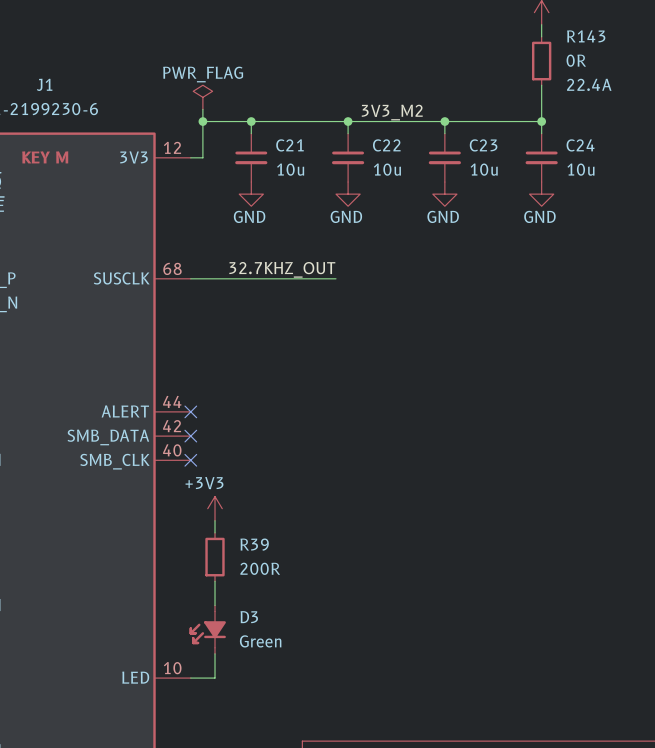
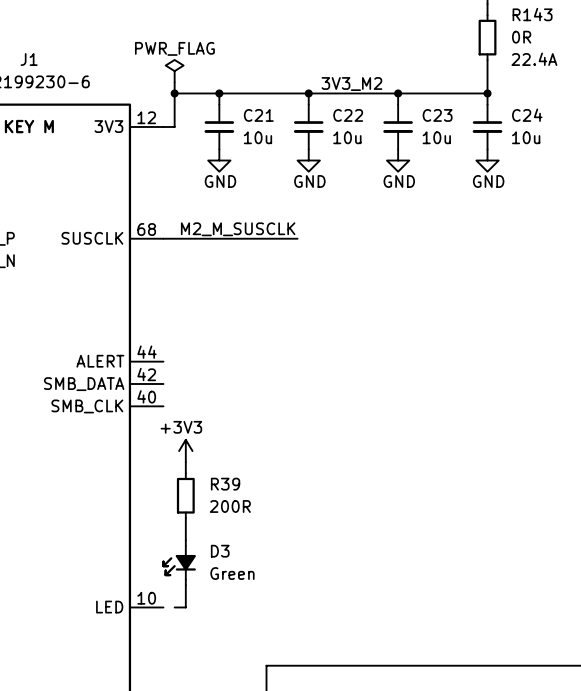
label: 32.7KHZ_OUT (282, 269) -> M2_M_SUSCLK (238, 229)
no-connect mark: (190, 411) -> none
no-connect mark: (190, 436) -> none
no-connect mark: (190, 460) -> none
wire: (190, 678) (202, 678) -> none

